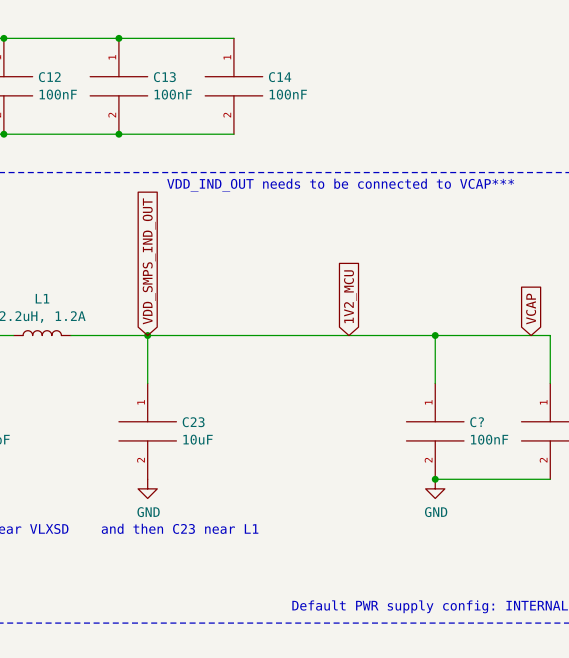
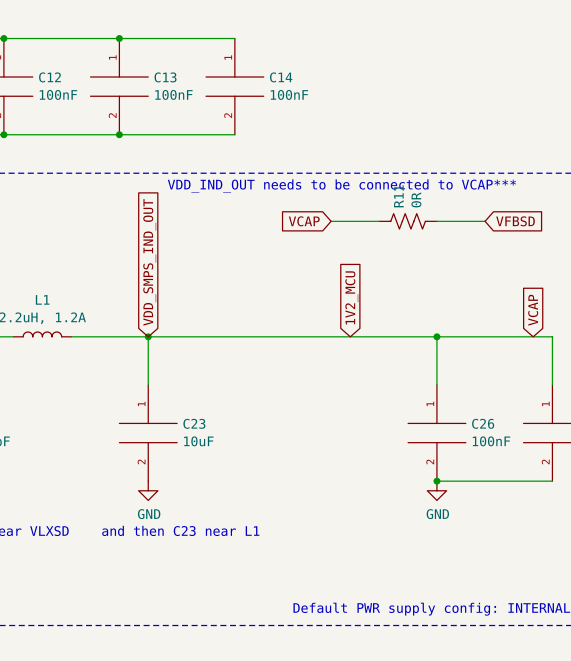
global label: none -> VCAP (304, 221)
wire: none -> (331, 221) (379, 221)
R11: none -> 0R (408, 221)
wire: none -> (436, 221) (485, 221)
global label: none -> VFBSD (515, 221)
C? name: C? (477, 422) -> C26 (483, 423)

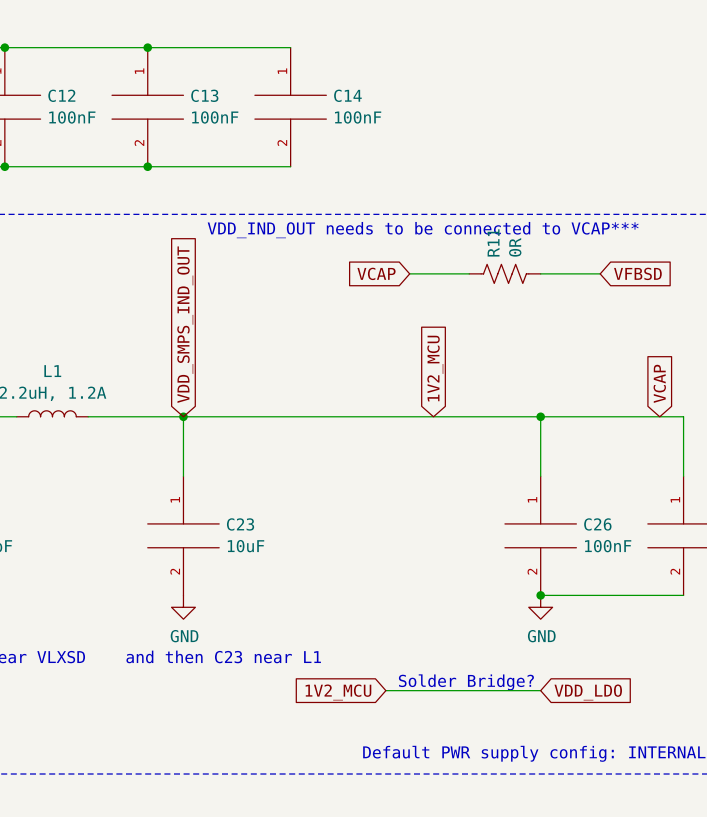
text: none -> Solder Bridge? (466, 682)
wire: none -> (385, 690) (540, 690)
global label: none -> 1V2_MCU (338, 692)
global label: none -> VDD_LDO (588, 692)

